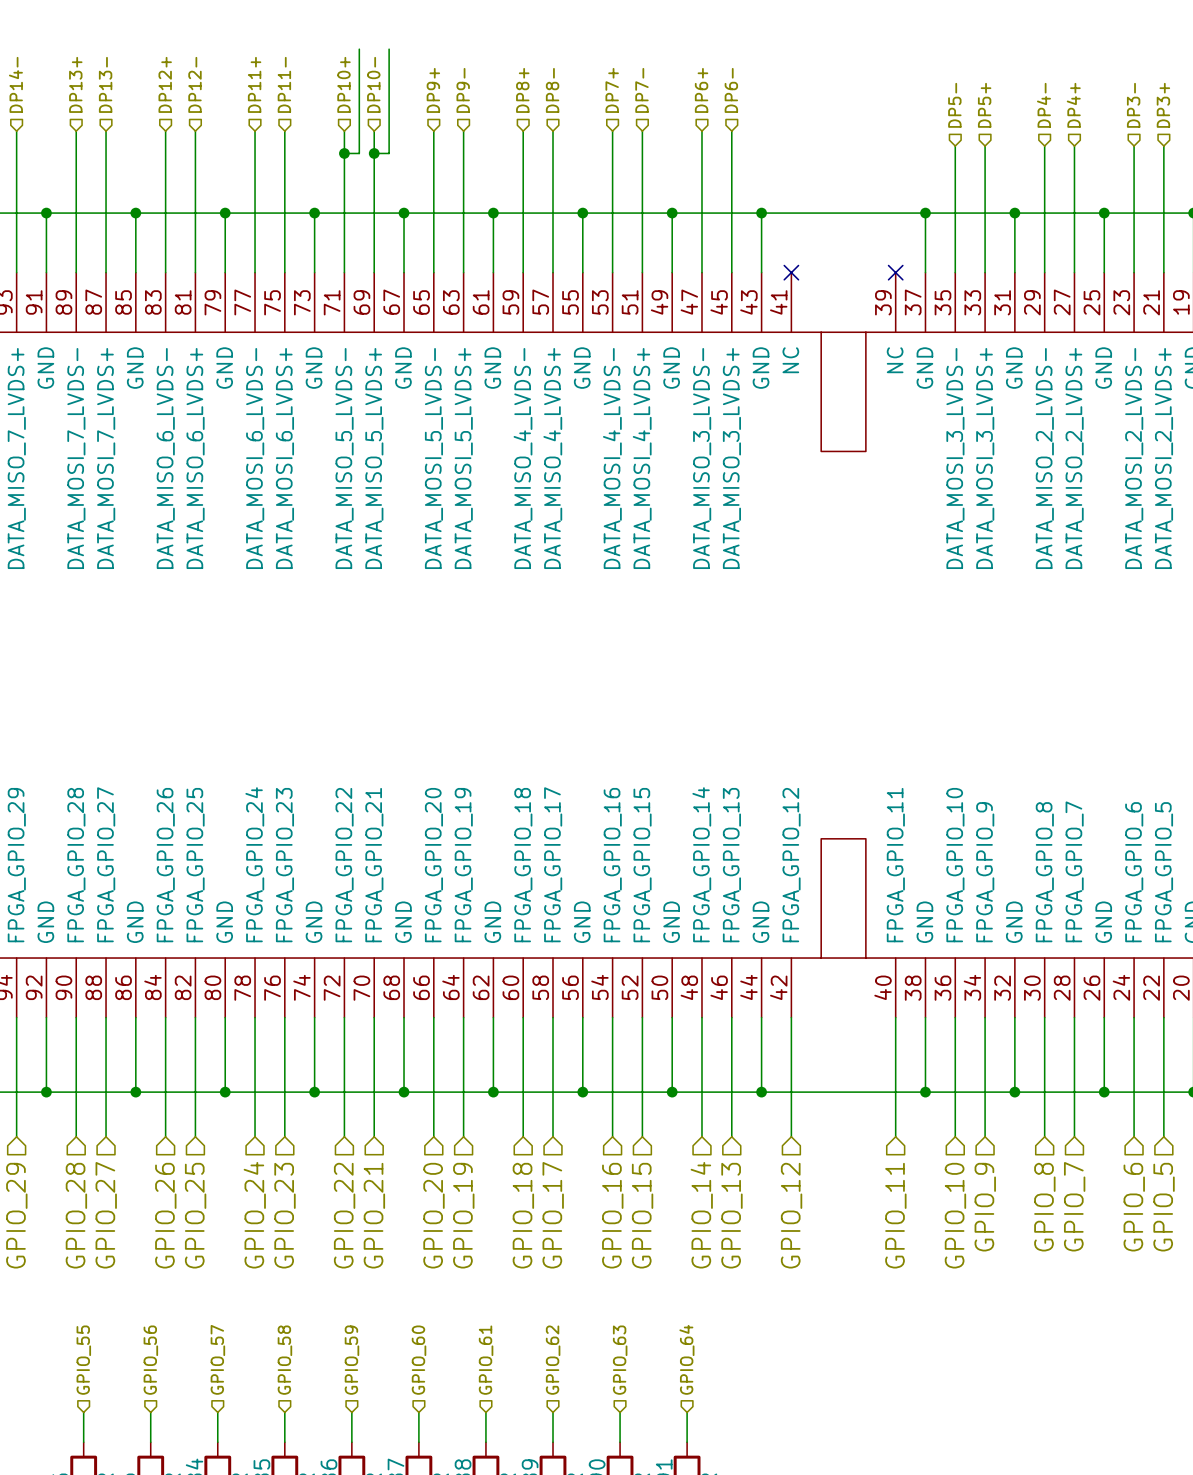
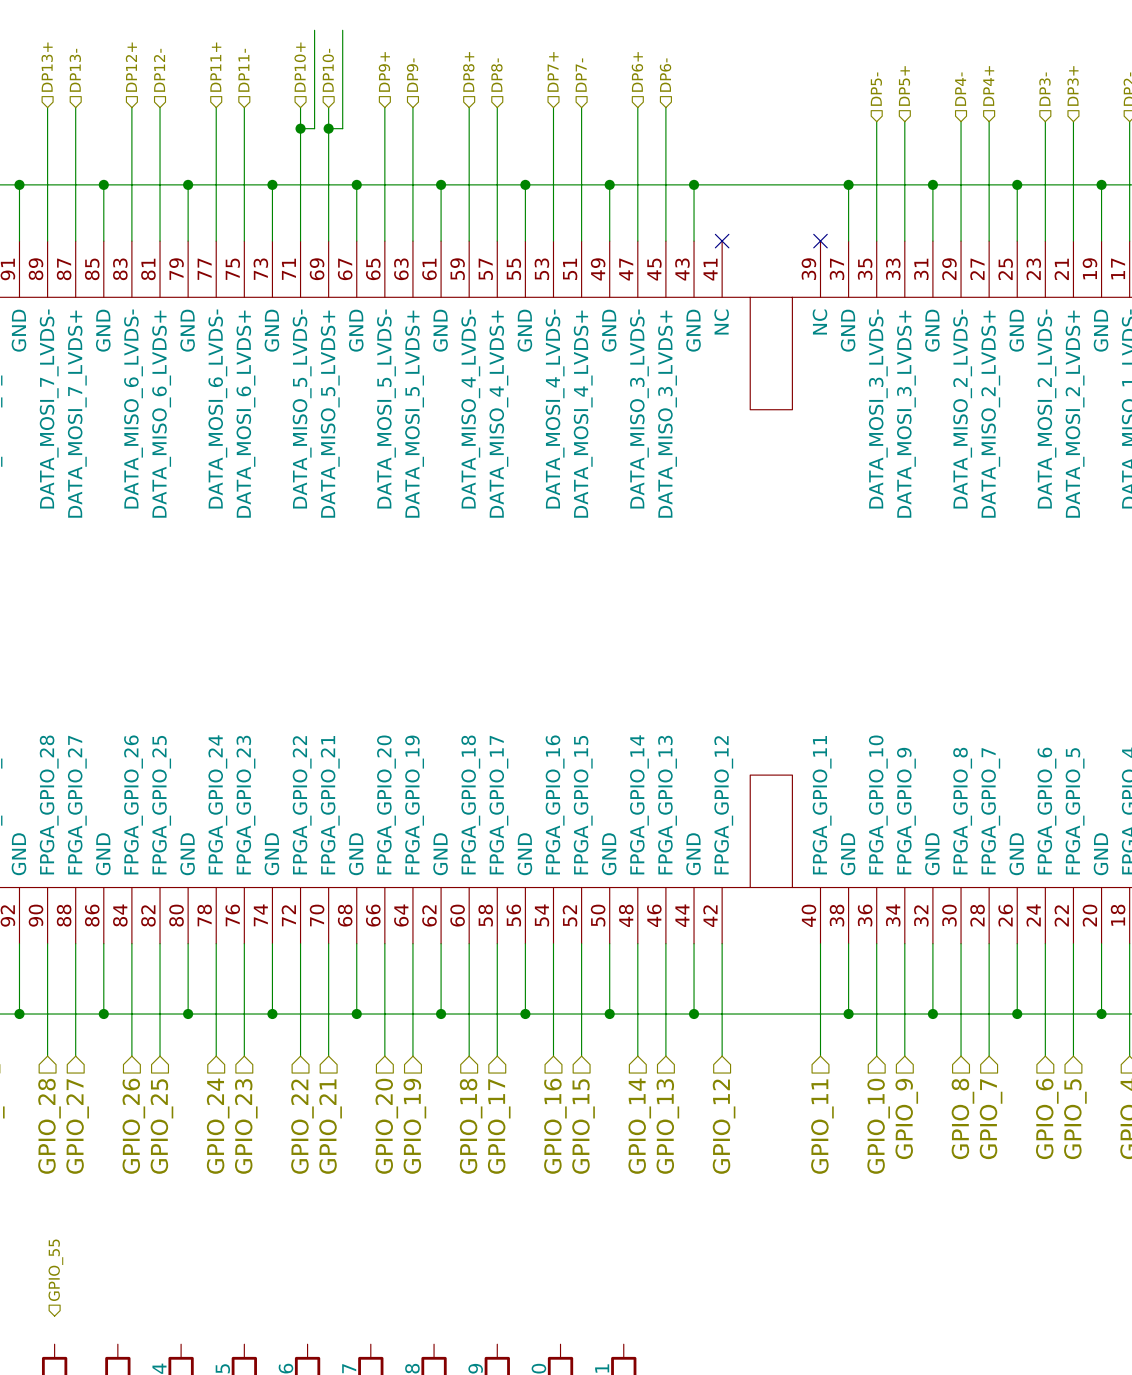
hierarchical label: GPIO_57 (217, 1359) -> none
hierarchical label: GPIO_64 (686, 1359) -> none
hierarchical label: GPIO_56 (150, 1360) -> none
hierarchical label: GPIO_58 (284, 1360) -> none
hierarchical label: GPIO_59 (351, 1360) -> none
hierarchical label: GPIO_60 (419, 1360) -> none
hierarchical label: GPIO_61 (486, 1360) -> none
hierarchical label: GPIO_62 (553, 1360) -> none
hierarchical label: GPIO_63 (620, 1360) -> none
wire: (83, 1412) (83, 1442) -> none
wire: (150, 1412) (150, 1442) -> none
wire: (217, 1412) (217, 1442) -> none
wire: (284, 1412) (284, 1442) -> none
wire: (351, 1412) (351, 1442) -> none
wire: (418, 1412) (418, 1442) -> none
wire: (485, 1412) (485, 1442) -> none
wire: (553, 1412) (553, 1442) -> none
wire: (620, 1412) (620, 1442) -> none
wire: (687, 1412) (687, 1442) -> none

